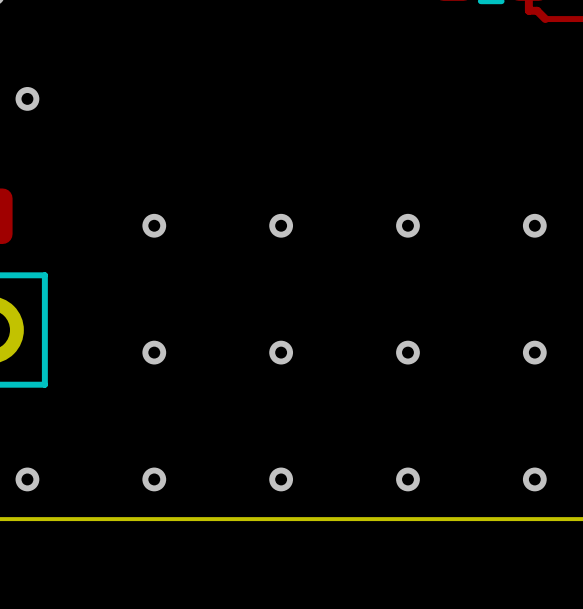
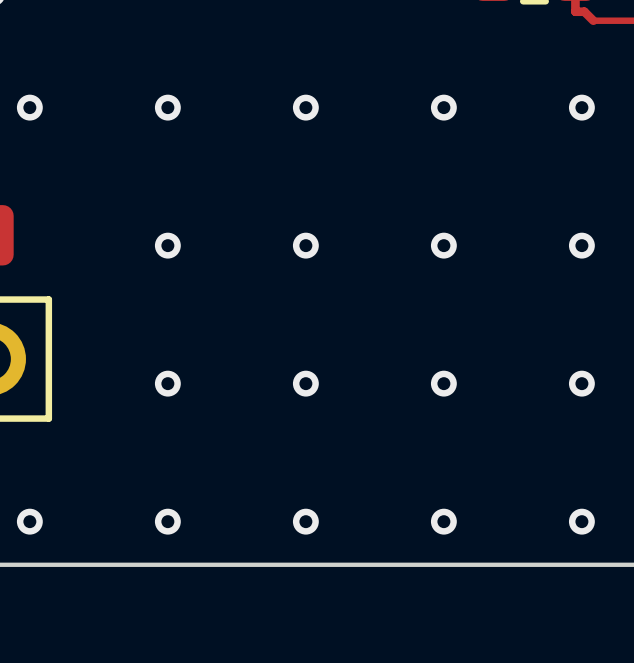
via: none -> (167, 107)
via: none -> (305, 107)
via: none -> (443, 107)
via: none -> (581, 107)

